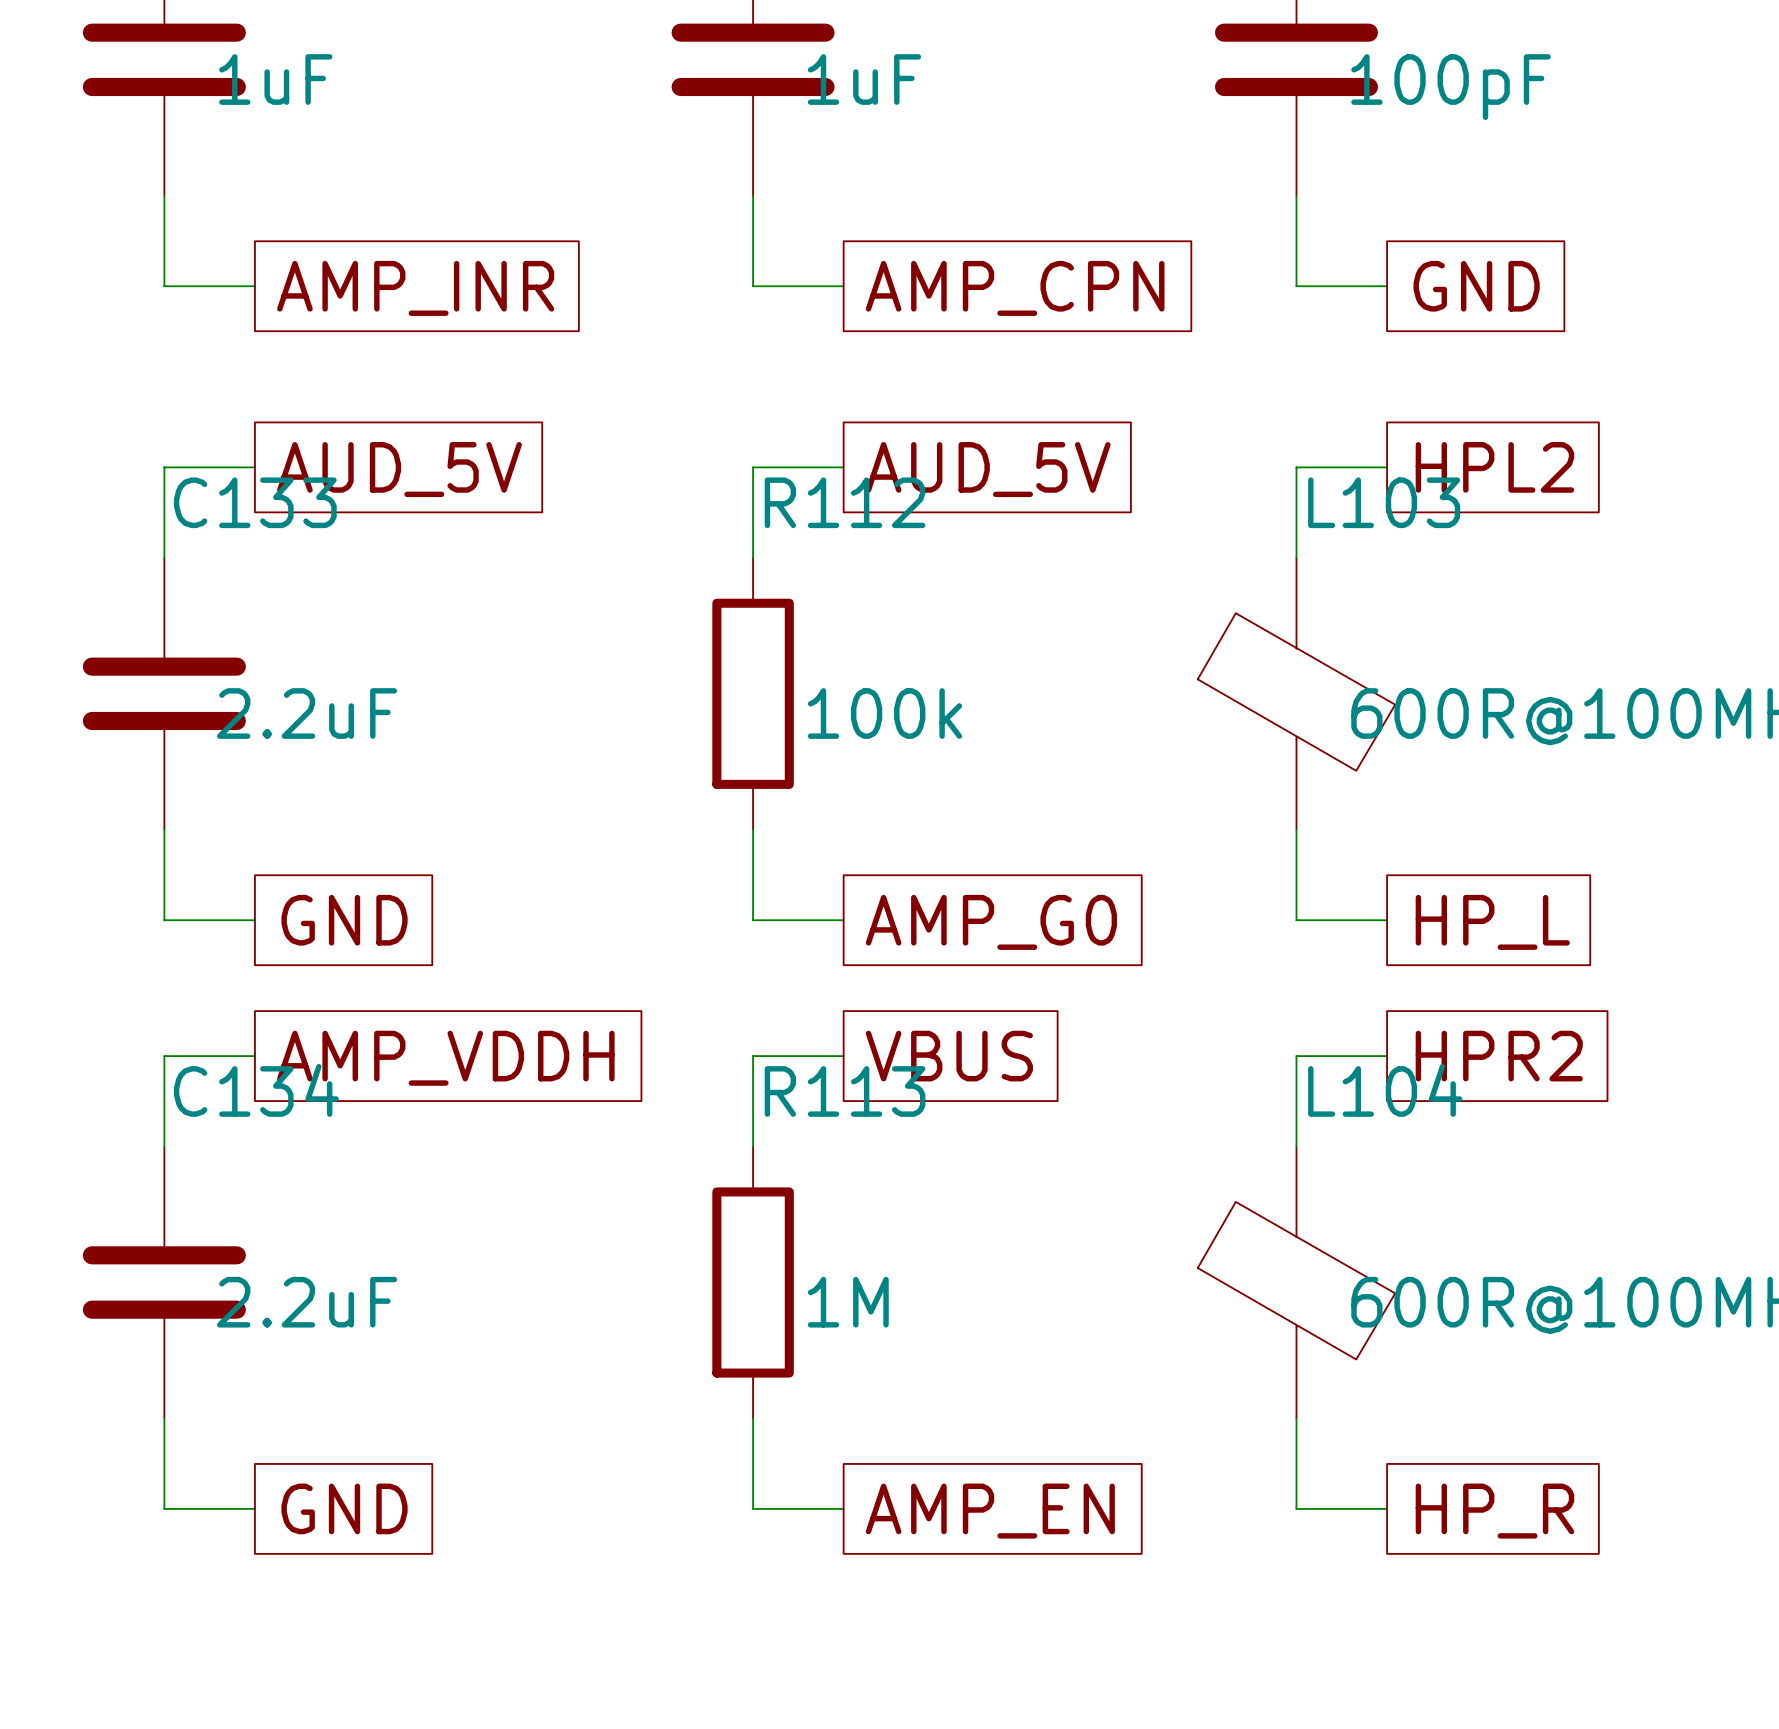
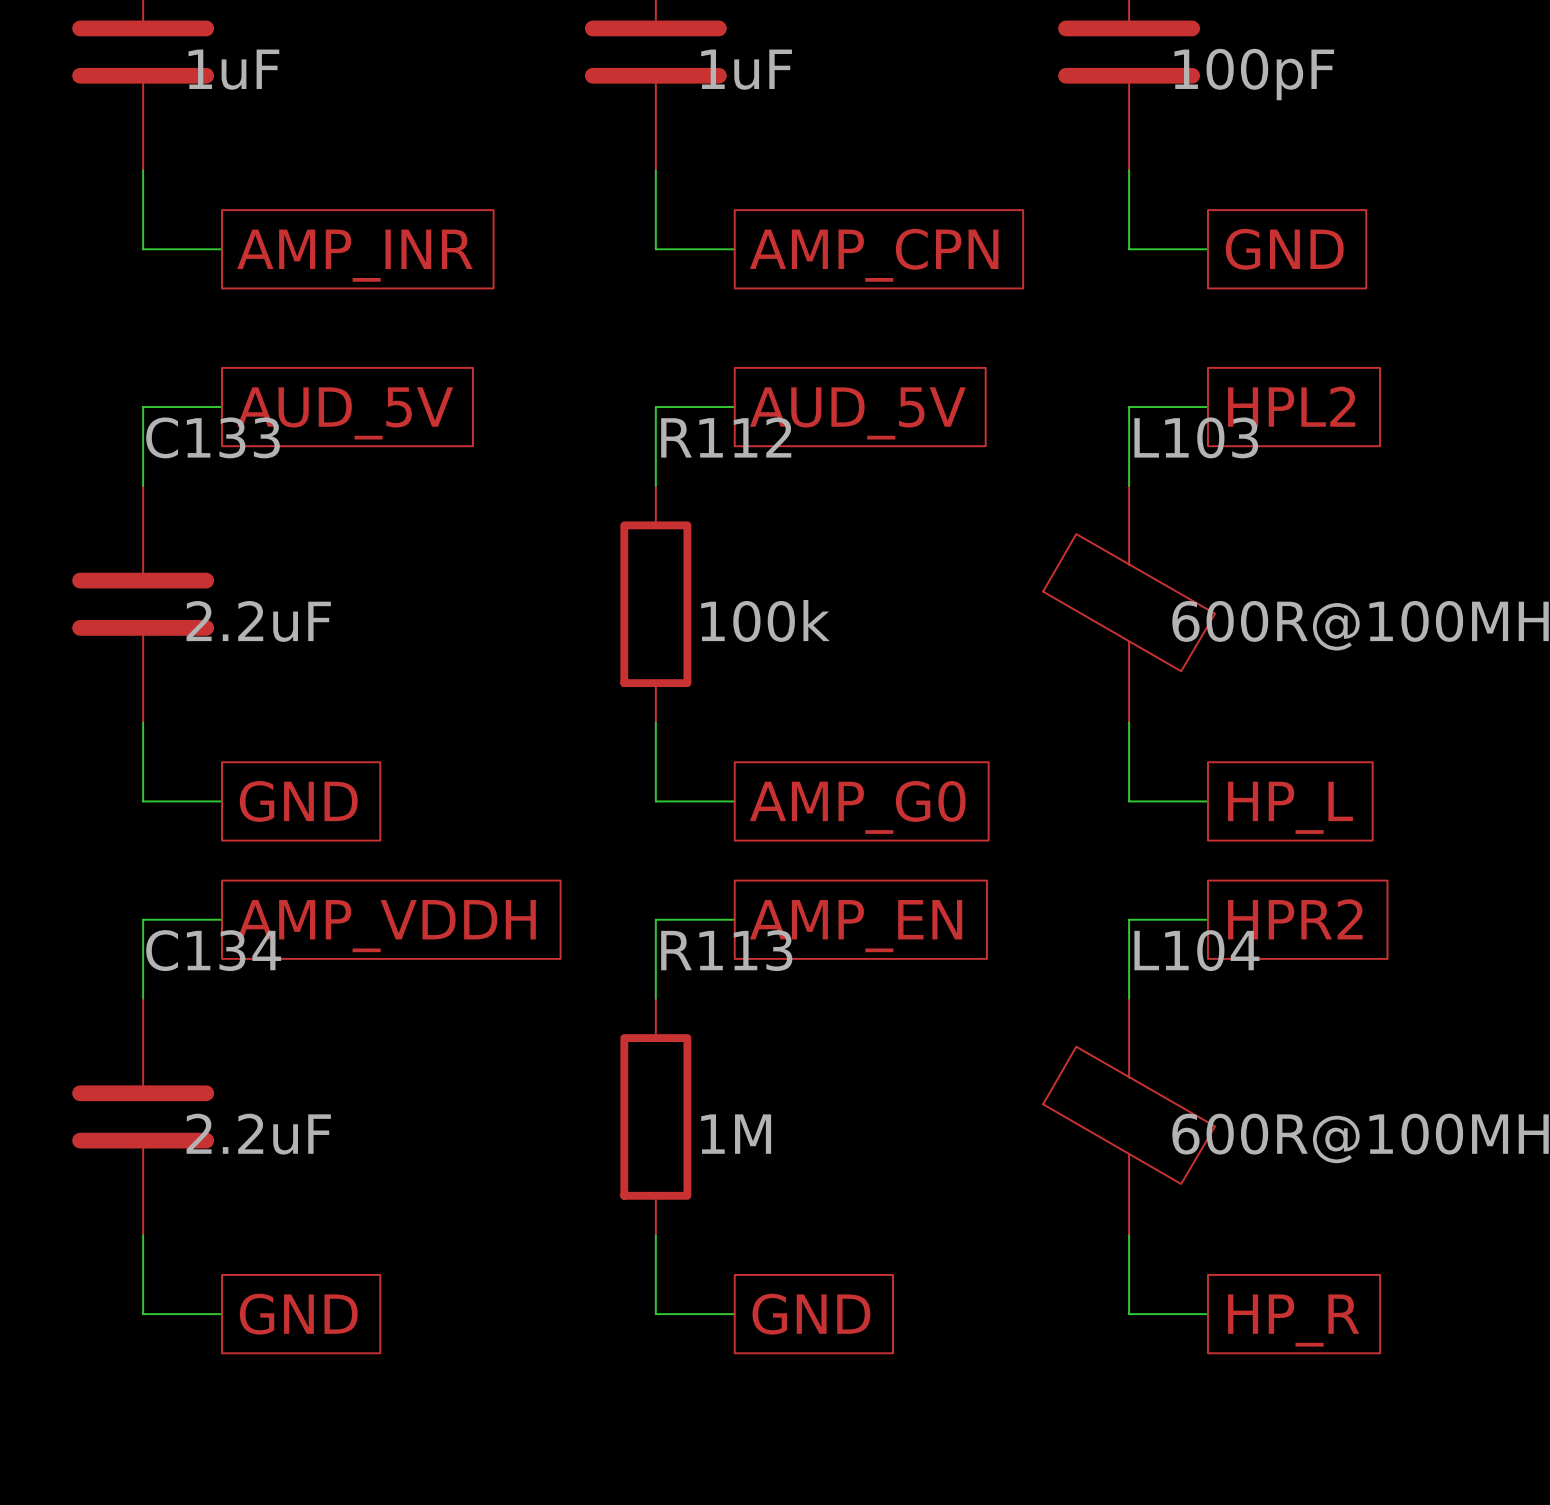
global label: VBUS (949, 1056) -> AMP_EN (856, 926)
global label: AMP_EN (990, 1511) -> GND (811, 1314)

